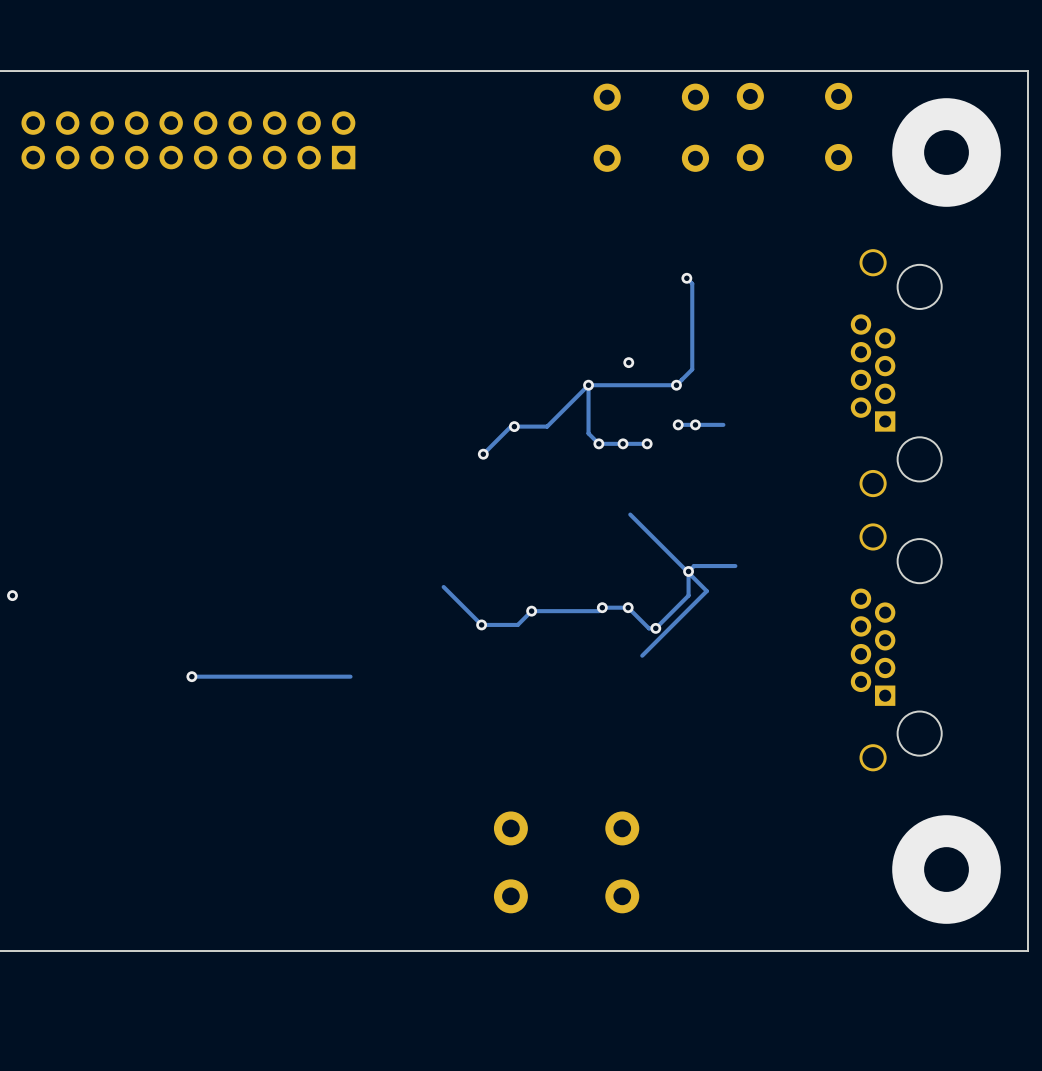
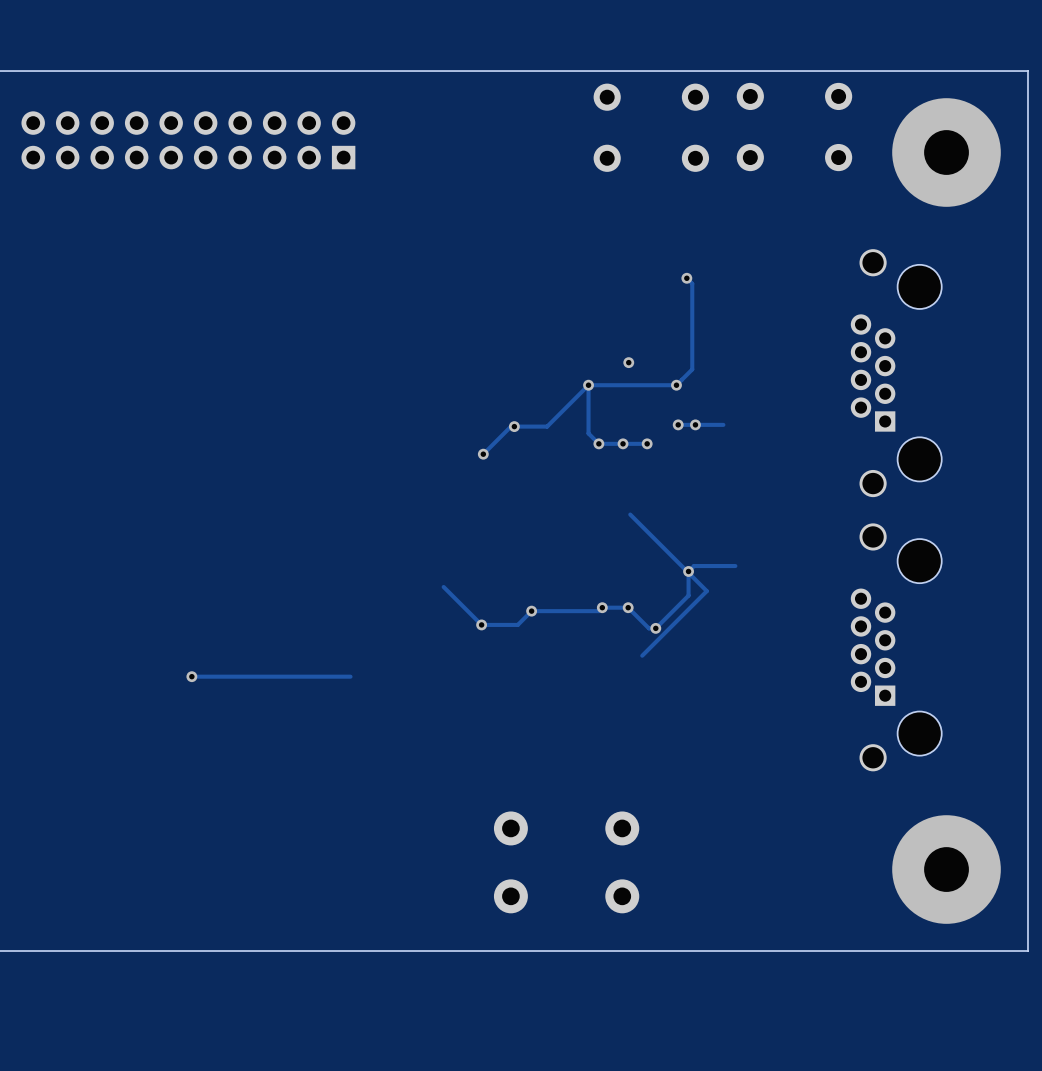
via: (12, 595) -> none

